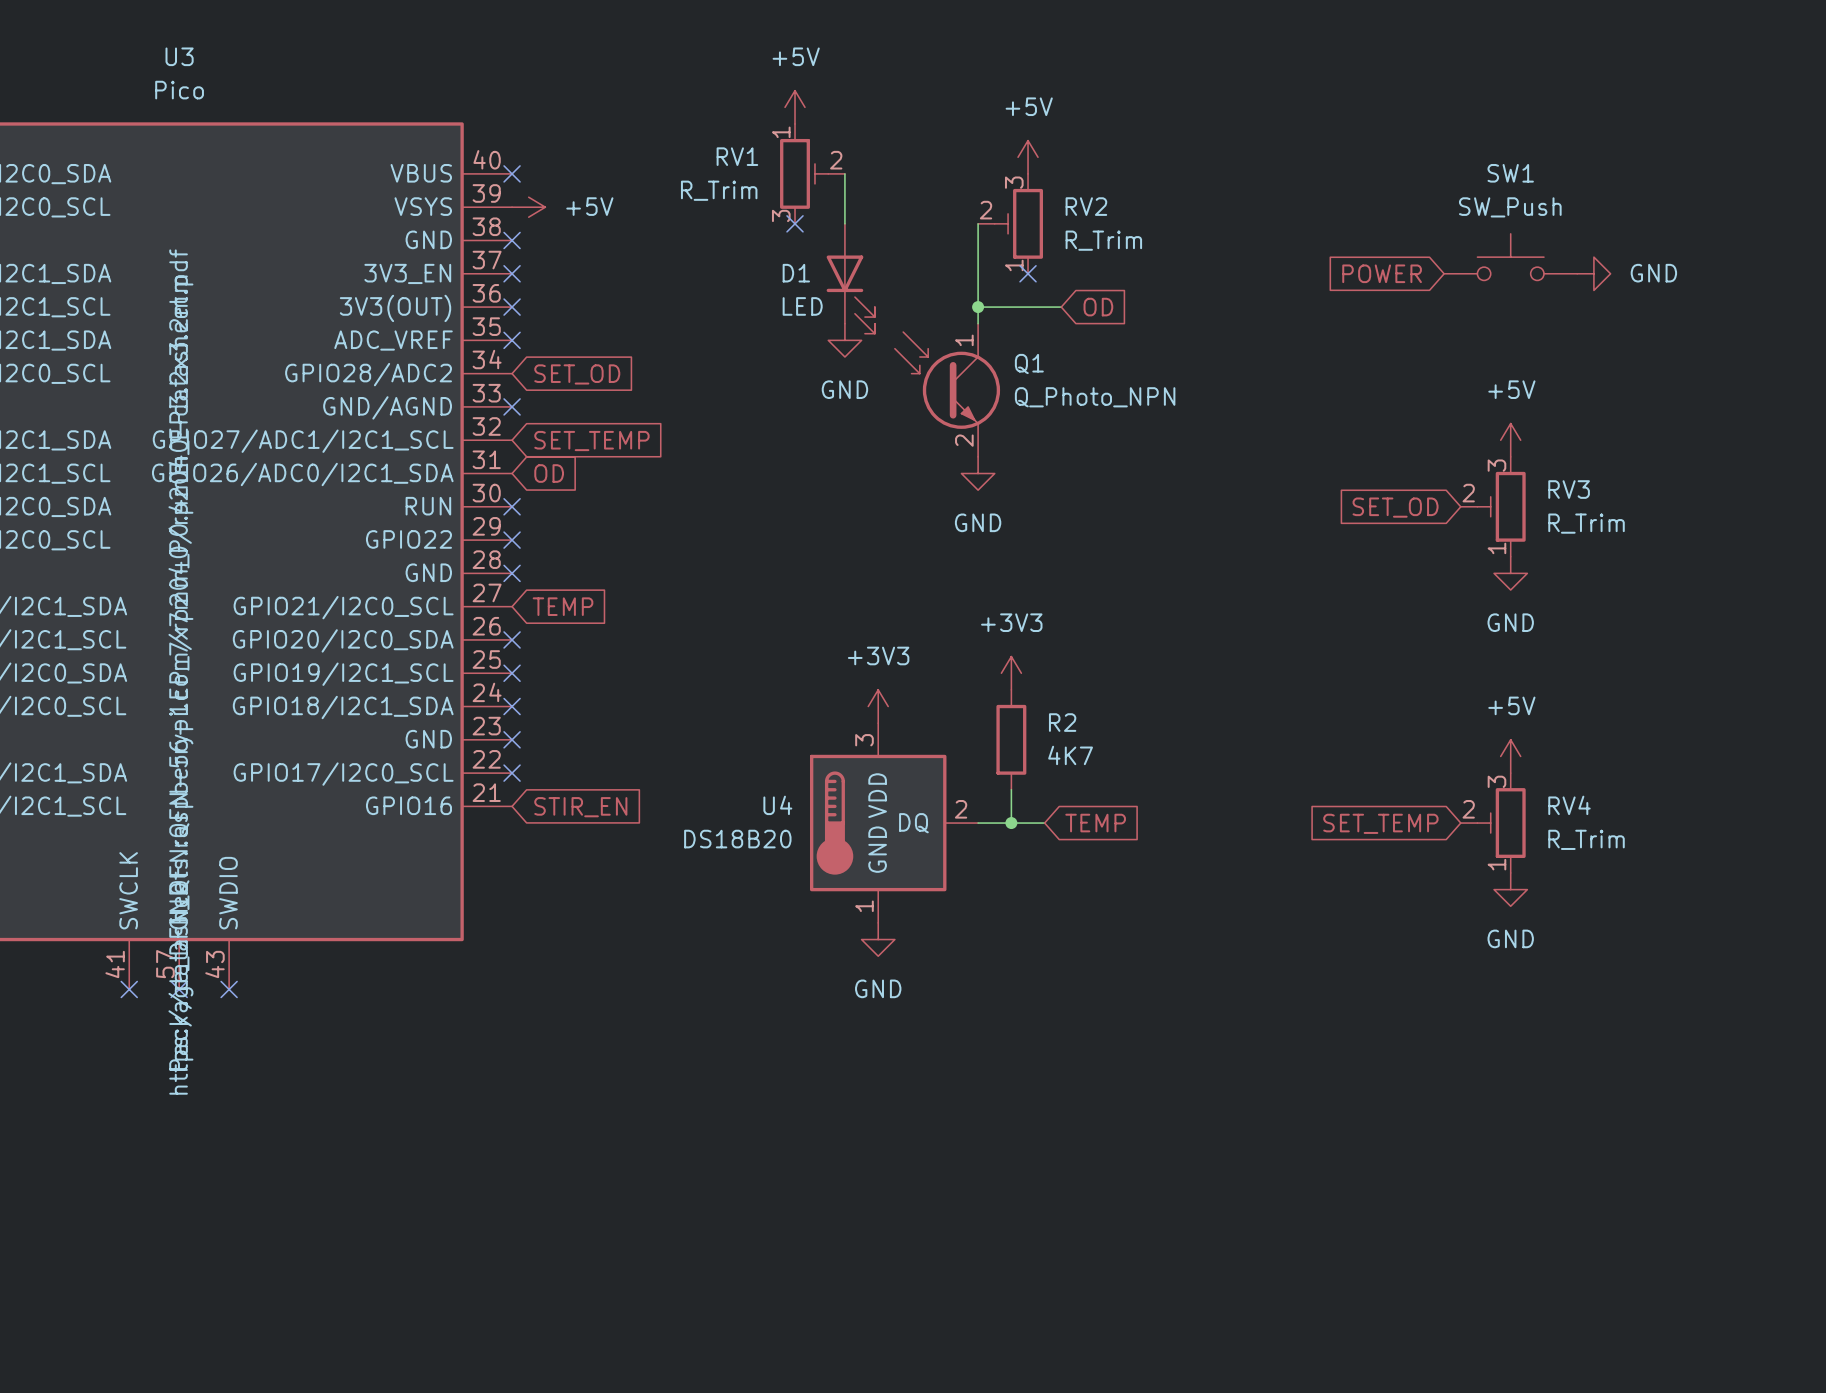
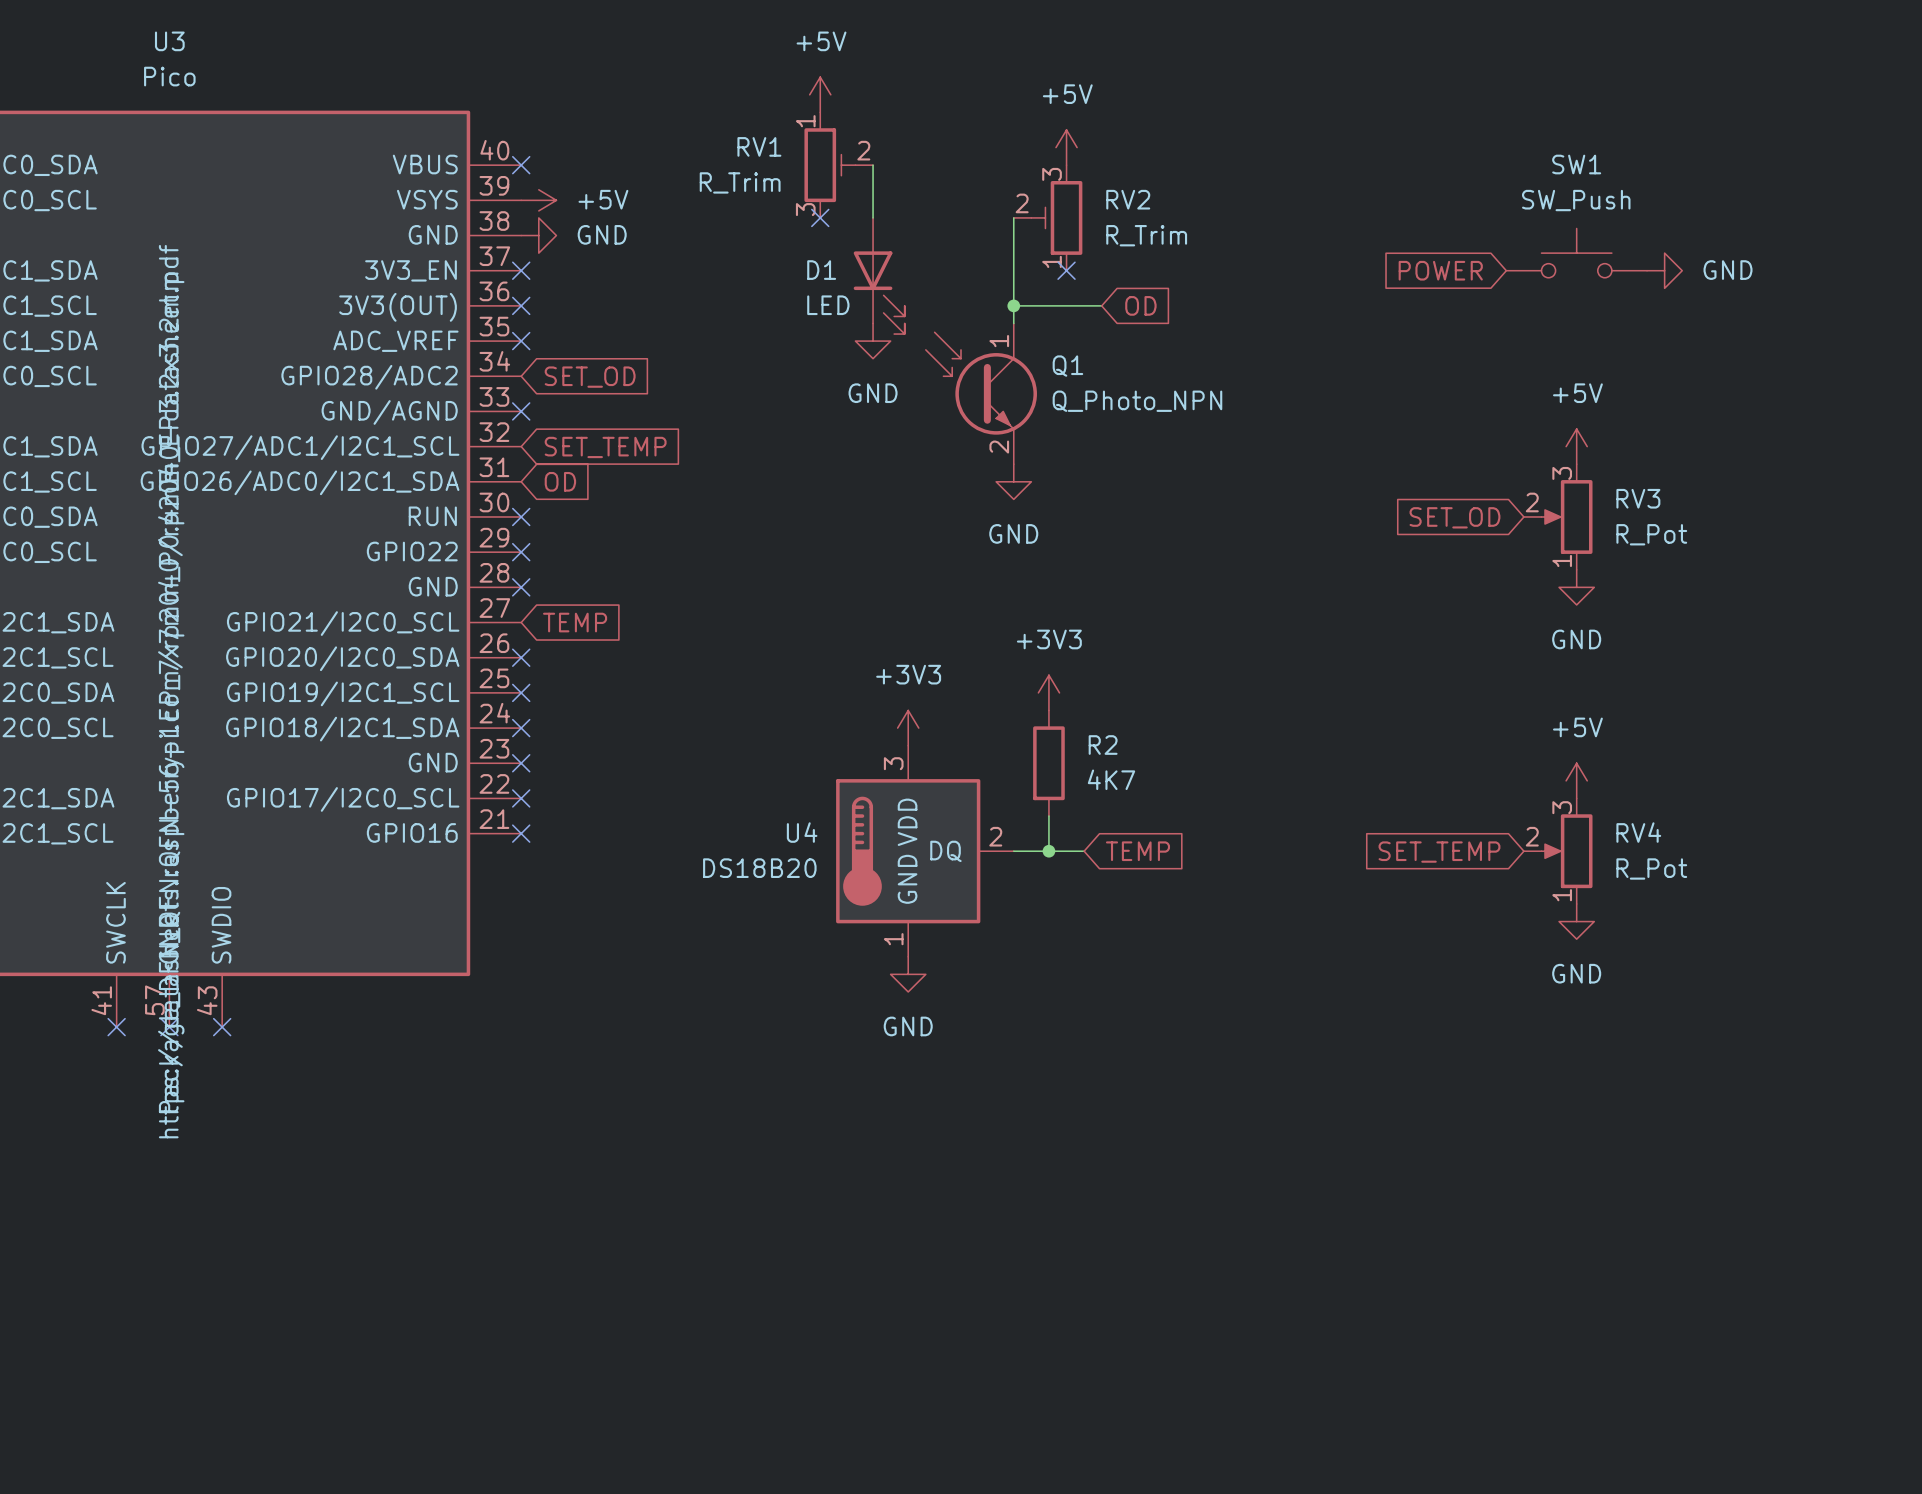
no-connect mark: (512, 240) -> none
power symbol: none -> GND (538, 235)
RV3 symbol: [1460, 456, 1526, 557] -> [1523, 464, 1593, 570]
RV3 value: R_Trim (1586, 523) -> R_Pot (1651, 534)
RV4 symbol: [1460, 773, 1526, 873] -> [1523, 798, 1593, 904]
no-connect mark: none -> (521, 833)
global label: STIR_EN (580, 807) -> none
RV4 value: R_Trim (1586, 839) -> R_Pot (1651, 868)

